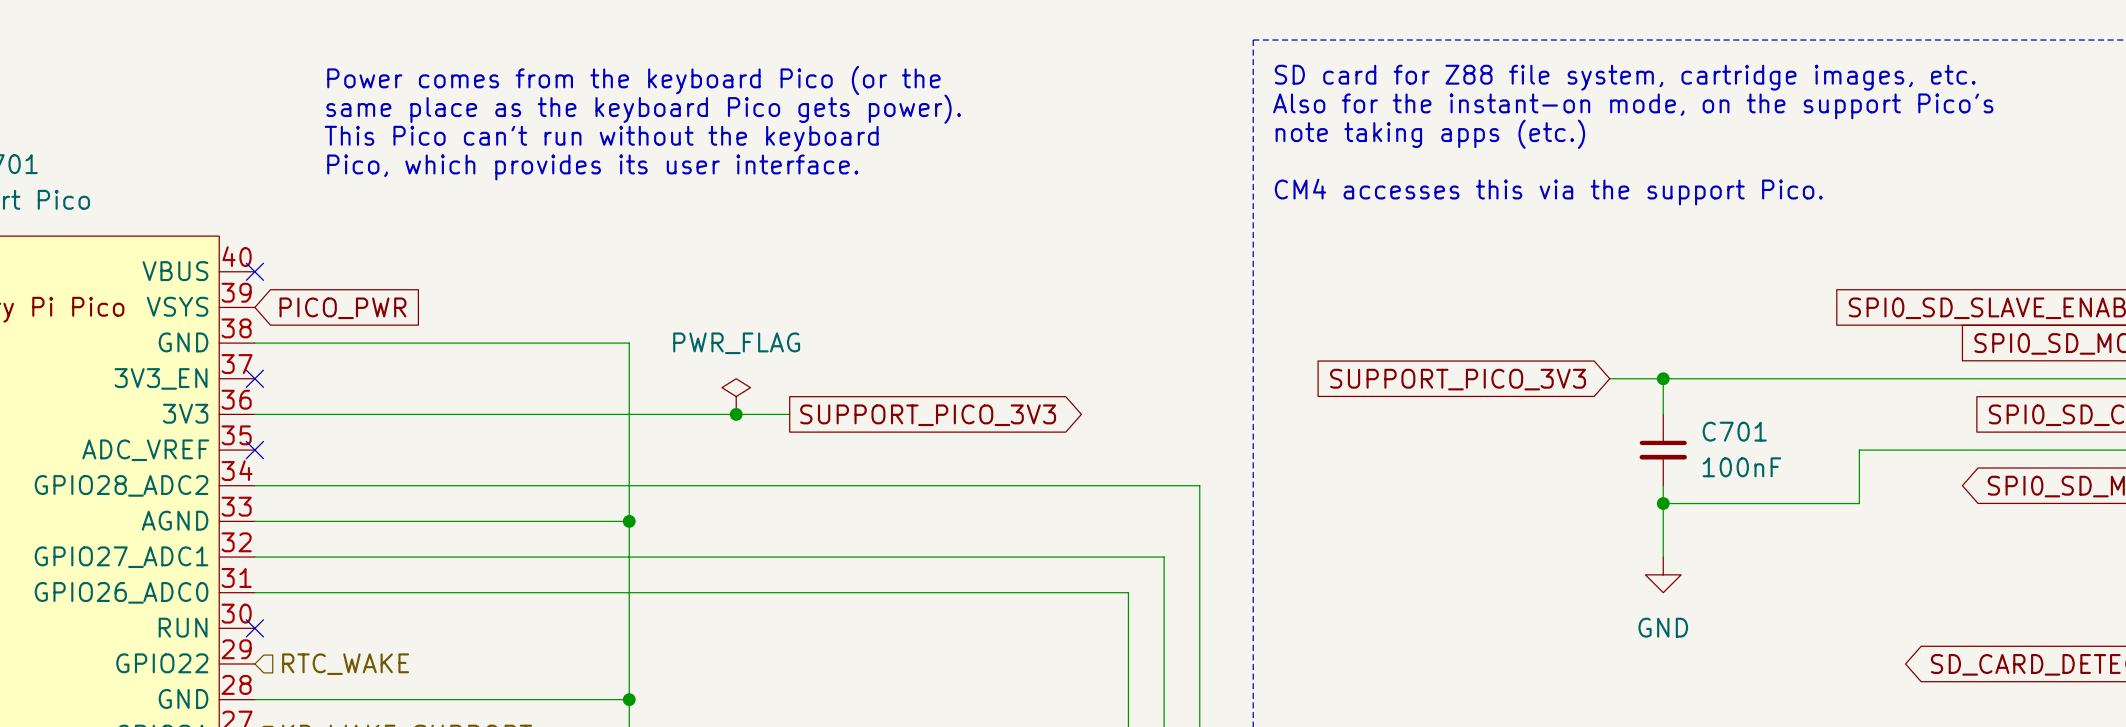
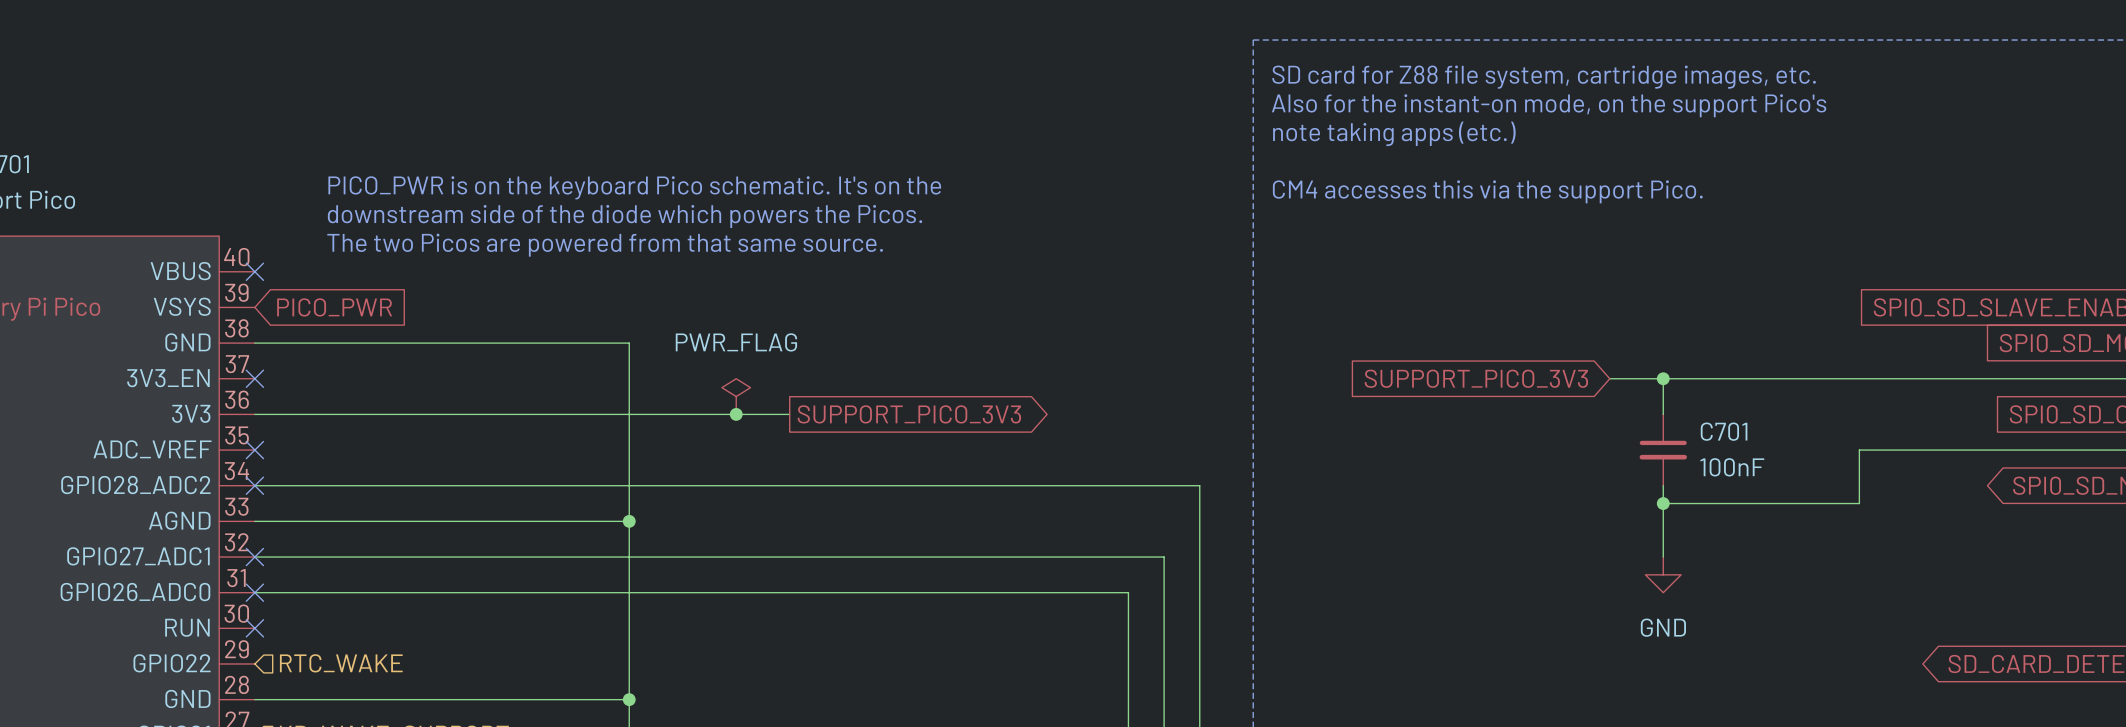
text: Power comes from the keyboard Pico (or the (633, 80) -> none
text: same place as the keyboard Pico gets power). (643, 109) -> none
text: This Pico can't run without the keyboard (601, 138) -> none
text: Pico, which provides its user interface. (592, 167) -> none
text: none -> PICO_PWR is on the keyboard Pico schematic. It's on the (634, 187)
text: none -> downstream side of the diode which powers the Picos. (625, 216)
text: none -> The two Picos are powered from that same source. (605, 245)
no-connect mark: none -> (254, 485)
no-connect mark: none -> (254, 557)
no-connect mark: none -> (254, 592)

